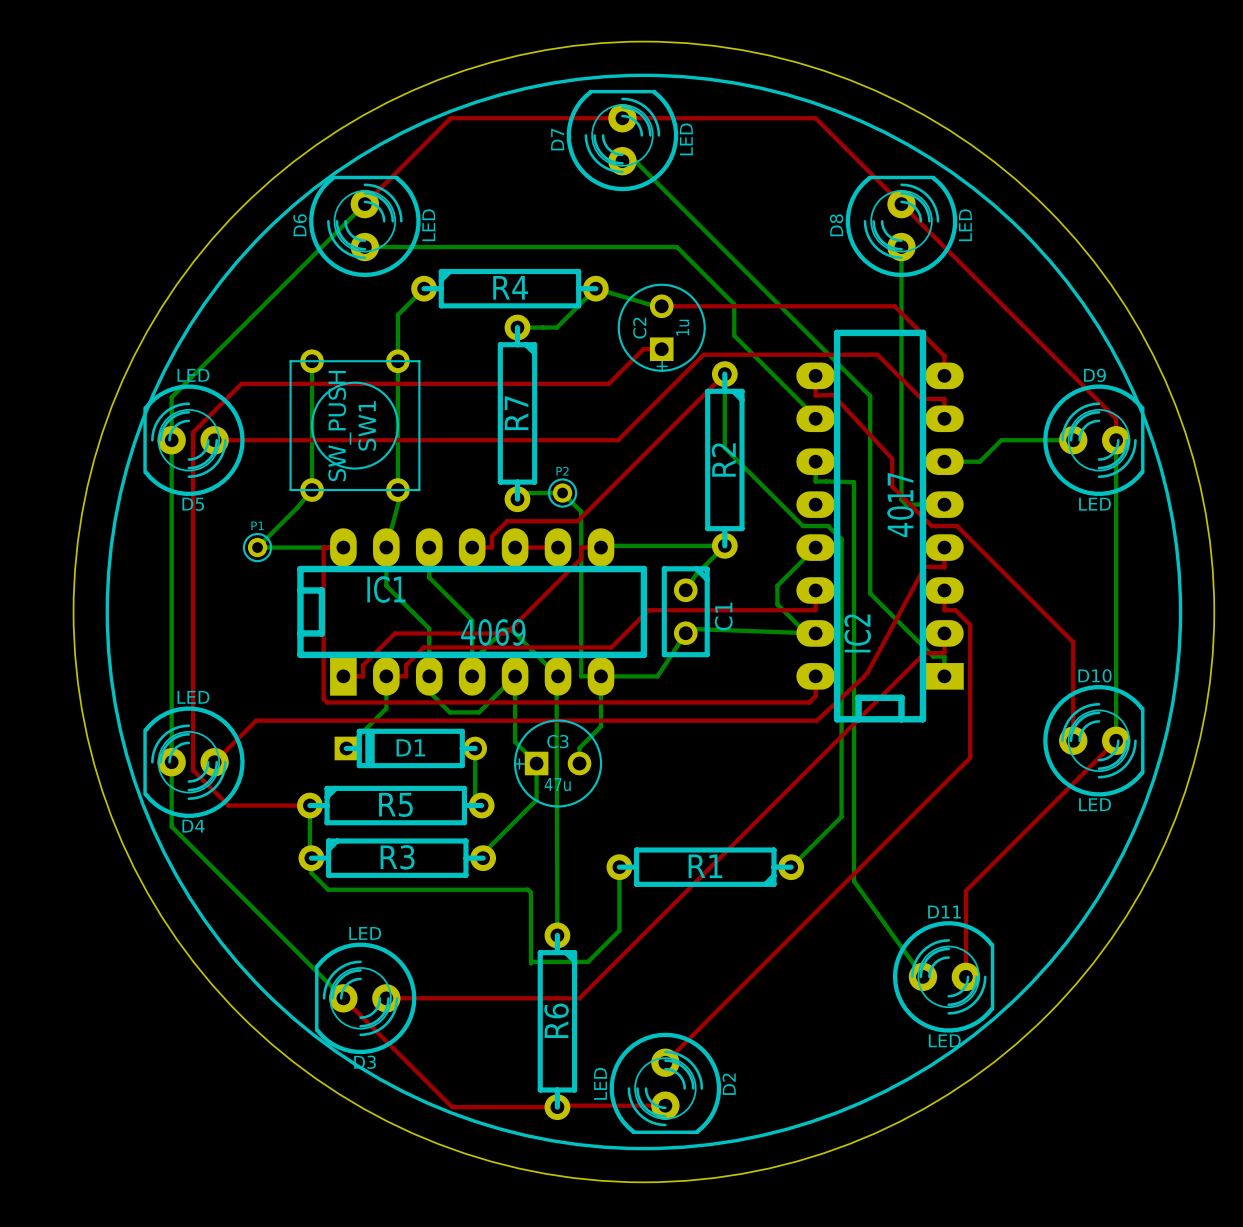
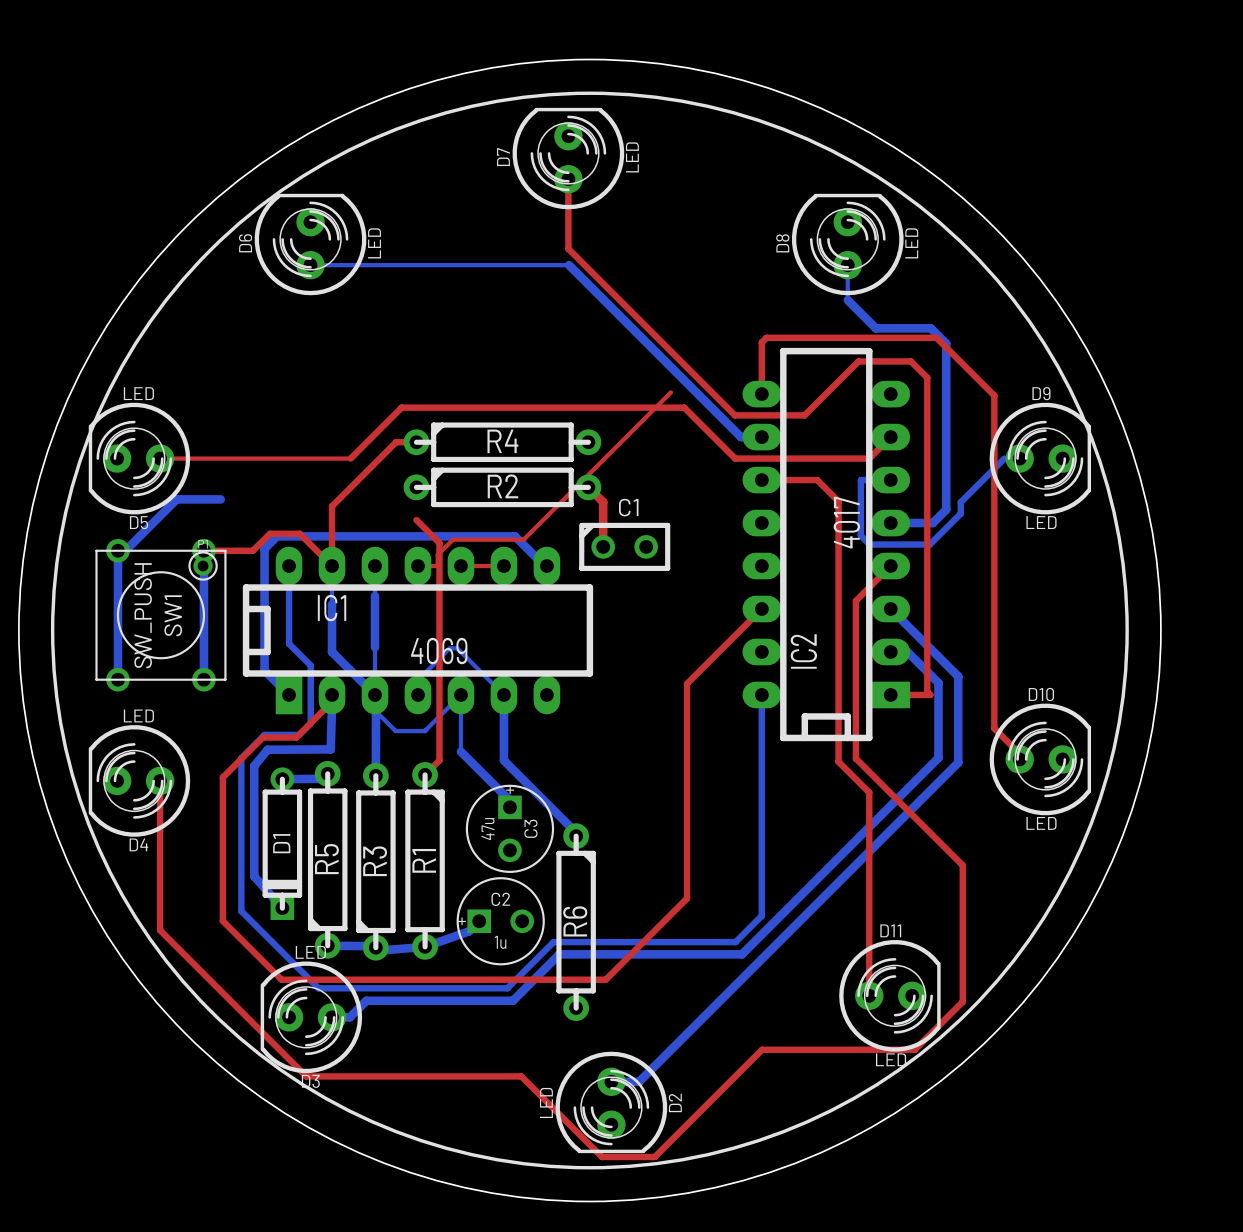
top track: none -> (568, 179) (568, 248) (734, 415) (804, 415) (858, 361) (910, 361) (927, 377) (927, 691) (930, 694) (890, 694)
bottom track: (622, 161) (635, 161) (870, 396) (870, 593) (933, 656) (944, 656) (944, 676) -> none
top track: (364, 204) (450, 118) (815, 118) (1116, 418) (1116, 440) -> none
bottom track: (364, 204) (171, 397) (171, 826) (343, 998) -> none
bottom track: (623, 247) (676, 247) (734, 304) (734, 335) (815, 418) -> (569, 265) (740, 437) (761, 437)
bottom track: (901, 282) (901, 499) (906, 504) (944, 504) -> (847, 300) (875, 328) (930, 328) (946, 343) (946, 509) (932, 523) (890, 523)
bottom track: (424, 288) (397, 314) (397, 490) (401, 493) (386, 547) -> none
R4 position: (509, 288) -> (502, 442)
top track: (661, 306) (894, 306) (944, 356) (944, 375) -> none
bottom track: (661, 306) (655, 306) (595, 288) (556, 327) (517, 327) -> none
C2 rotation: 0° (661, 327) -> 90° clockwise (500, 921)
C2 position: (661, 327) -> (500, 921)
top track: (661, 349) (643, 349) (608, 383) (241, 383) (193, 432) (193, 770) (228, 805) (309, 805) -> none
bottom track: (312, 361) (312, 490) (297, 507) (257, 547) (343, 547) -> (761, 694) (761, 915) (735, 942) (553, 942) (507, 988) (318, 988) (241, 911) (241, 758) (264, 734) (299, 734) (310, 723) (310, 665) (289, 643) (289, 566)
bottom track: (724, 374) (724, 447) (803, 526) (828, 526) (841, 539) (841, 816) (791, 867) -> none
top track: (815, 375) (815, 395) (833, 394) (892, 458) (892, 486) (931, 526) (957, 526) (1073, 642) (1073, 735) -> (761, 394) (761, 342) (766, 337) (936, 337) (994, 395) (994, 728) (1019, 753)
R7: (517, 413) -> none
top track: (944, 418) (944, 399) (921, 399) (877, 354) (703, 354) (618, 440) (405, 440) -> (890, 437) (869, 458) (735, 458) (684, 407) (401, 407) (350, 458)
top track: none -> (416, 442) (396, 442) (332, 506) (332, 566) (299, 533) (269, 533) (252, 550) (203, 550)
SW1 position: (354, 425) -> (160, 615)
bottom track: (1057, 440) (1001, 440) (979, 461) (944, 461) -> (1004, 458) (960, 502) (960, 513) (929, 544) (869, 544) (860, 535) (860, 480) (890, 480)
bottom track: (1116, 440) (1116, 740) -> none
R2 rotation: 0° (724, 459) -> 90° counterclockwise (502, 487)
R2 position: (724, 459) -> (502, 487)
top track: none -> (761, 480) (817, 480) (838, 501) (838, 761) (869, 792) (869, 995)
bottom track: (815, 461) (815, 481) (854, 482) (854, 881) (922, 976) -> none
top track: none -> (588, 487) (603, 502) (603, 546)
bottom track: none -> (220, 499) (176, 499) (125, 550) (117, 550) (117, 679)
P2: (562, 493) -> none
bottom track: (517, 499) (523, 493) (562, 493) (581, 511) (581, 676) (657, 676) (690, 628) (815, 633) (806, 633) (777, 604) (777, 585) (815, 547) -> none
top track: none -> (416, 520) (439, 543) (439, 760) (425, 774)
bottom track: none -> (203, 550) (203, 679)
top track: (343, 547) (323, 547) (323, 698) (327, 702) (809, 702) (815, 696) (815, 676) -> none
top track: (600, 547) (581, 547) (581, 558) (506, 633) (394, 633) (363, 665) (363, 676) (343, 676) -> none
bottom track: (600, 547) (602, 545) (724, 545) (696, 574) (685, 590) -> (546, 566) (515, 536) (277, 536) (264, 548) (264, 670) (289, 694)
top track: (944, 547) (944, 567) (924, 566) (867, 672) (816, 720) (256, 720) (214, 762) -> (890, 566) (855, 600) (855, 758) (962, 865) (962, 1001) (914, 1049) (762, 1049) (654, 1157) (601, 1157) (521, 1076) (306, 1076) (160, 930) (160, 780)
bottom track: (429, 577) (472, 620) (472, 675) -> none
bottom track: (386, 585) (429, 628) -> (375, 596) (375, 647)
bottom track: none -> (332, 604) (332, 651) (376, 696) (375, 775)
top track: (815, 590) (815, 610) (648, 610) (611, 647) (423, 647) (406, 665) (406, 676) (386, 676) -> (761, 609) (687, 683) (687, 898) (605, 979) (281, 979) (222, 921) (222, 777) (262, 737) (296, 737) (332, 701) (332, 694)
top track: (944, 590) (944, 610) (955, 610) (970, 624) (970, 757) (665, 1062) -> none
bottom track: none -> (890, 609) (958, 676) (958, 762) (639, 1081) (611, 1081)
C1 rotation: 0° (685, 611) -> 90° counterclockwise (624, 546)
C1 position: (685, 611) -> (624, 546)
top track: (944, 633) (944, 653) (924, 653) (579, 998) (386, 998) -> none
bottom track: none -> (890, 651) (907, 651) (938, 682) (938, 757) (742, 954) (559, 954) (512, 1000) (366, 1000) (349, 1017) (332, 1017)
bottom track: (558, 676) (556, 677) (557, 935) -> (503, 694) (503, 760) (576, 832) (576, 836)
bottom track: (600, 676) (600, 726) (579, 748) (579, 763) -> none
bottom track: (386, 686) (386, 708) (346, 748) -> (332, 704) (330, 749) (267, 749) (254, 766) (254, 876) (282, 908)
bottom track: (515, 733) (515, 742) (536, 763) (536, 799) (483, 853) (483, 858) -> (460, 751) (509, 800) (509, 807)
top track: (1116, 740) (965, 891) (965, 976) -> none
D1 rotation: 0° (410, 748) -> 90° counterclockwise (282, 843)
D1 position: (410, 748) -> (282, 843)
bottom track: (475, 748) (475, 799) (481, 805) -> none
bottom track: none -> (327, 773) (322, 778) (282, 779)
C3 rotation: 0° (558, 763) -> 90° clockwise (509, 828)
bottom track: (309, 805) (311, 872) (328, 889) (528, 889) (531, 892) (531, 963) (588, 961) (619, 930) (619, 867) -> none
R5 rotation: 0° (395, 805) -> 90° counterclockwise (327, 859)
R3 rotation: 0° (397, 858) -> 90° counterclockwise (375, 861)
R1 rotation: 0° (705, 867) -> 90° counterclockwise (425, 860)
R1 position: (705, 867) -> (425, 860)
bottom track: none -> (479, 921) (469, 931) (425, 946) (378, 950) (374, 946) (327, 945)
top track: (343, 998) (452, 1107) (665, 1105) -> none
R6 position: (557, 1021) -> (576, 922)

